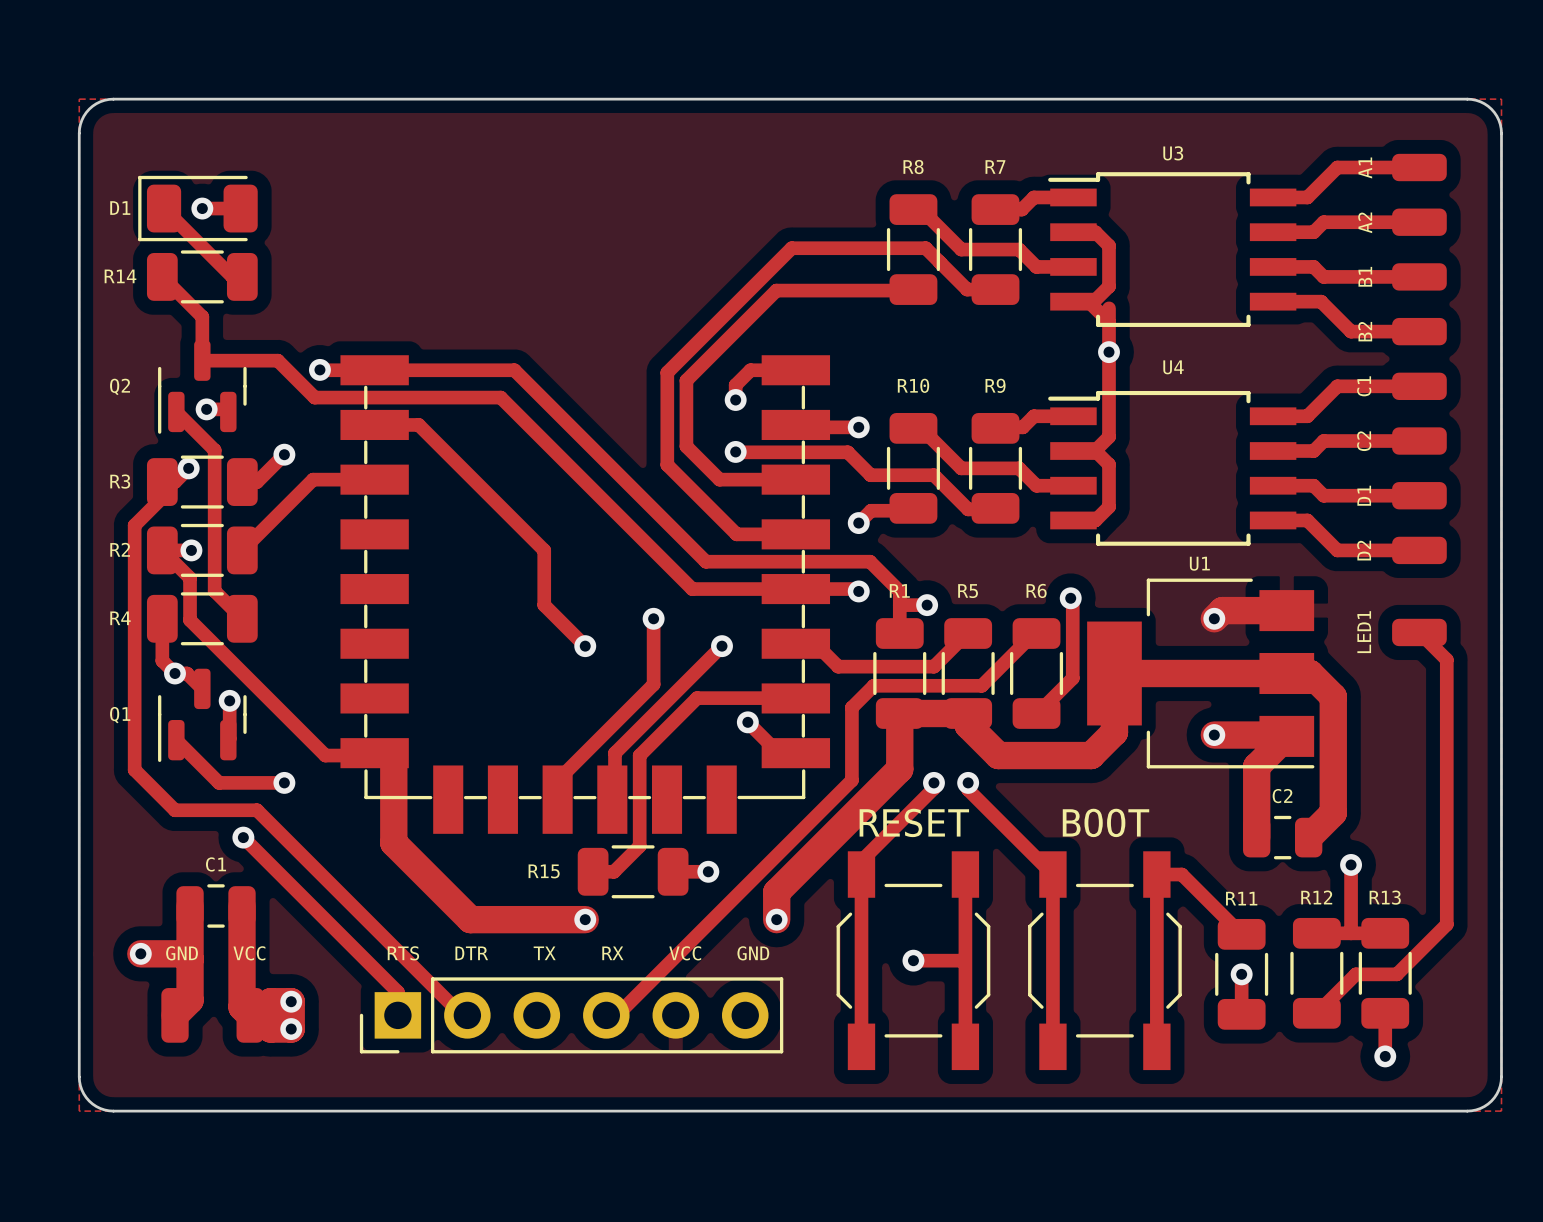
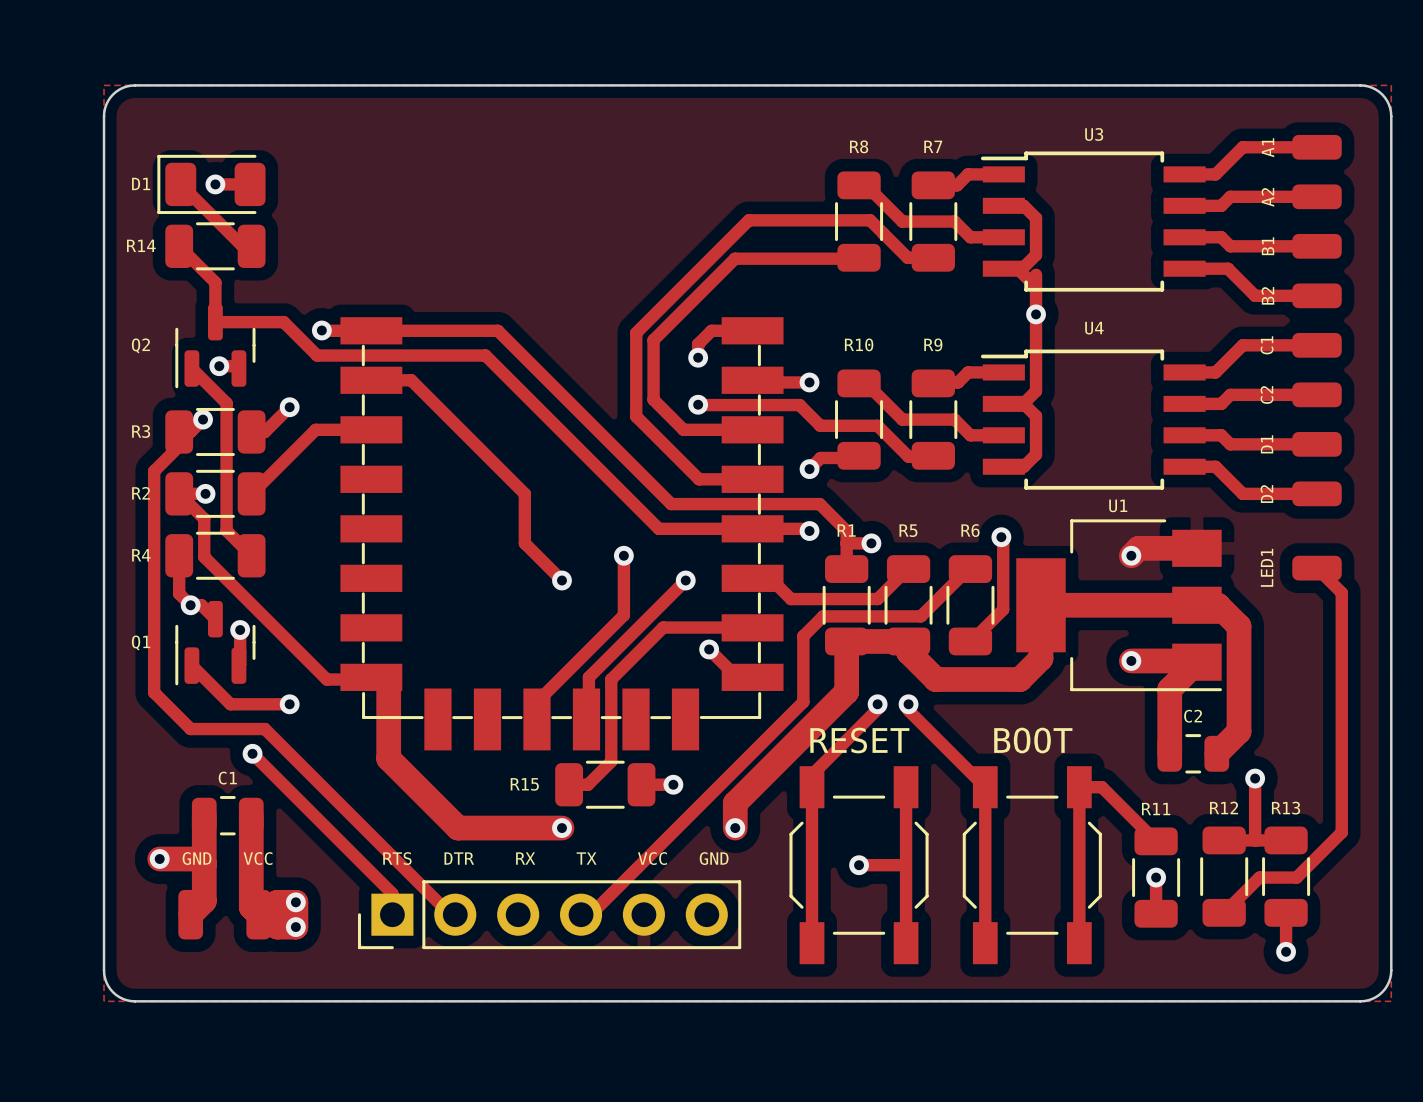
text: RTS DTR TX RX VCC GND (578, 953) -> RTS DTR RX TX VCC GND (555, 858)

